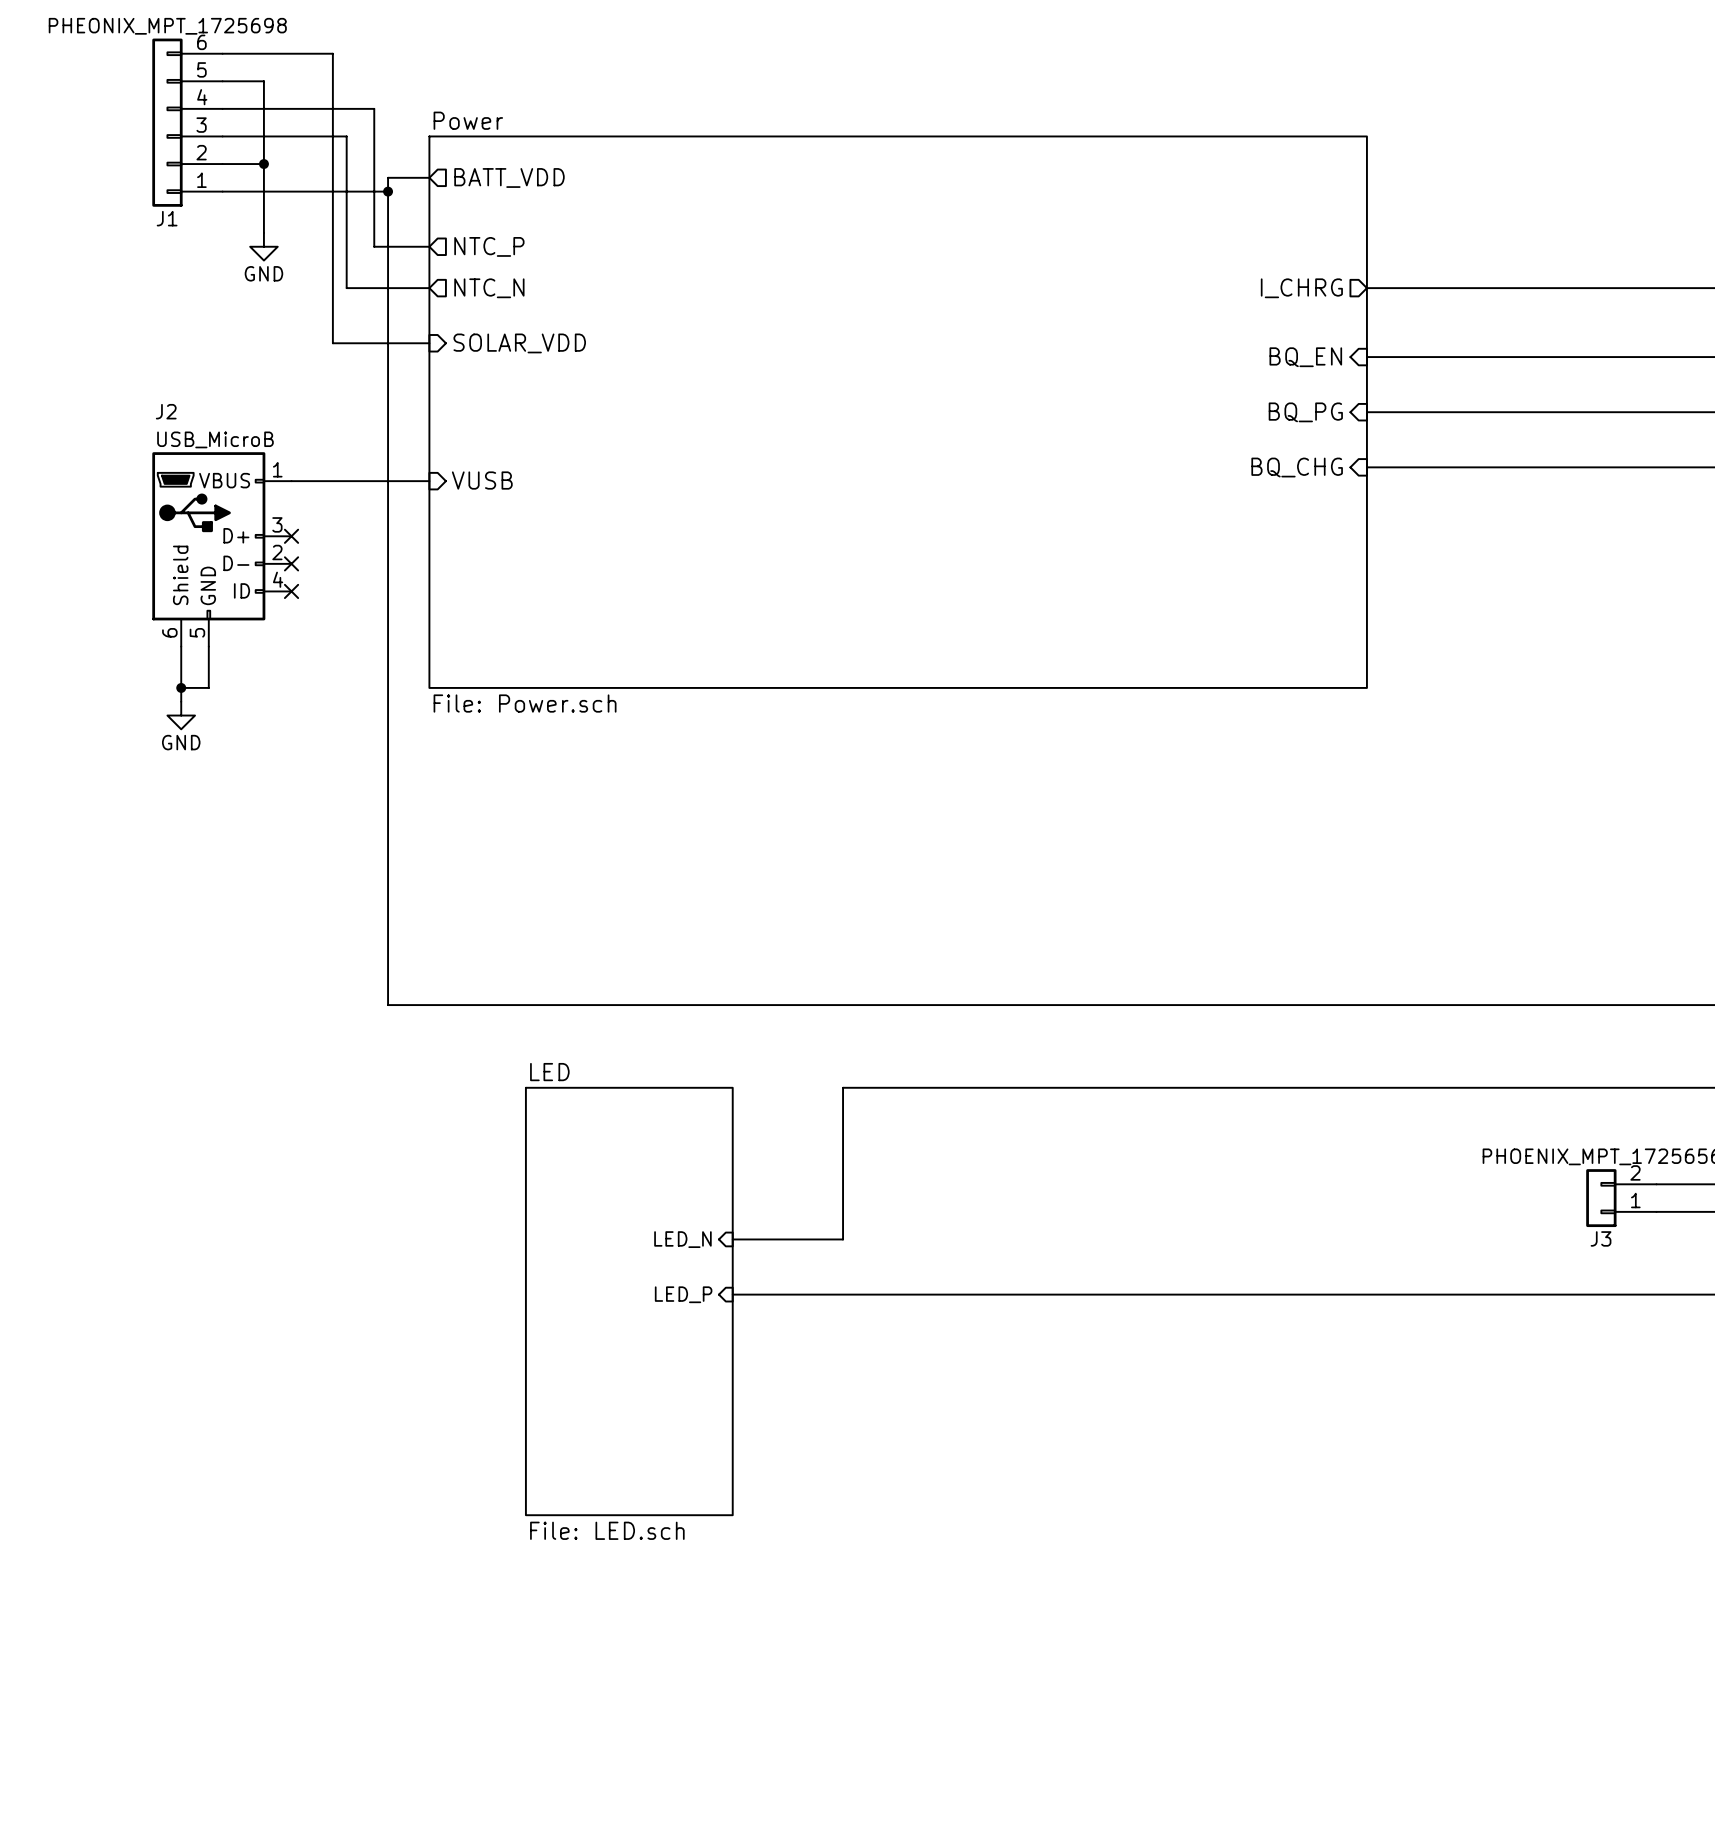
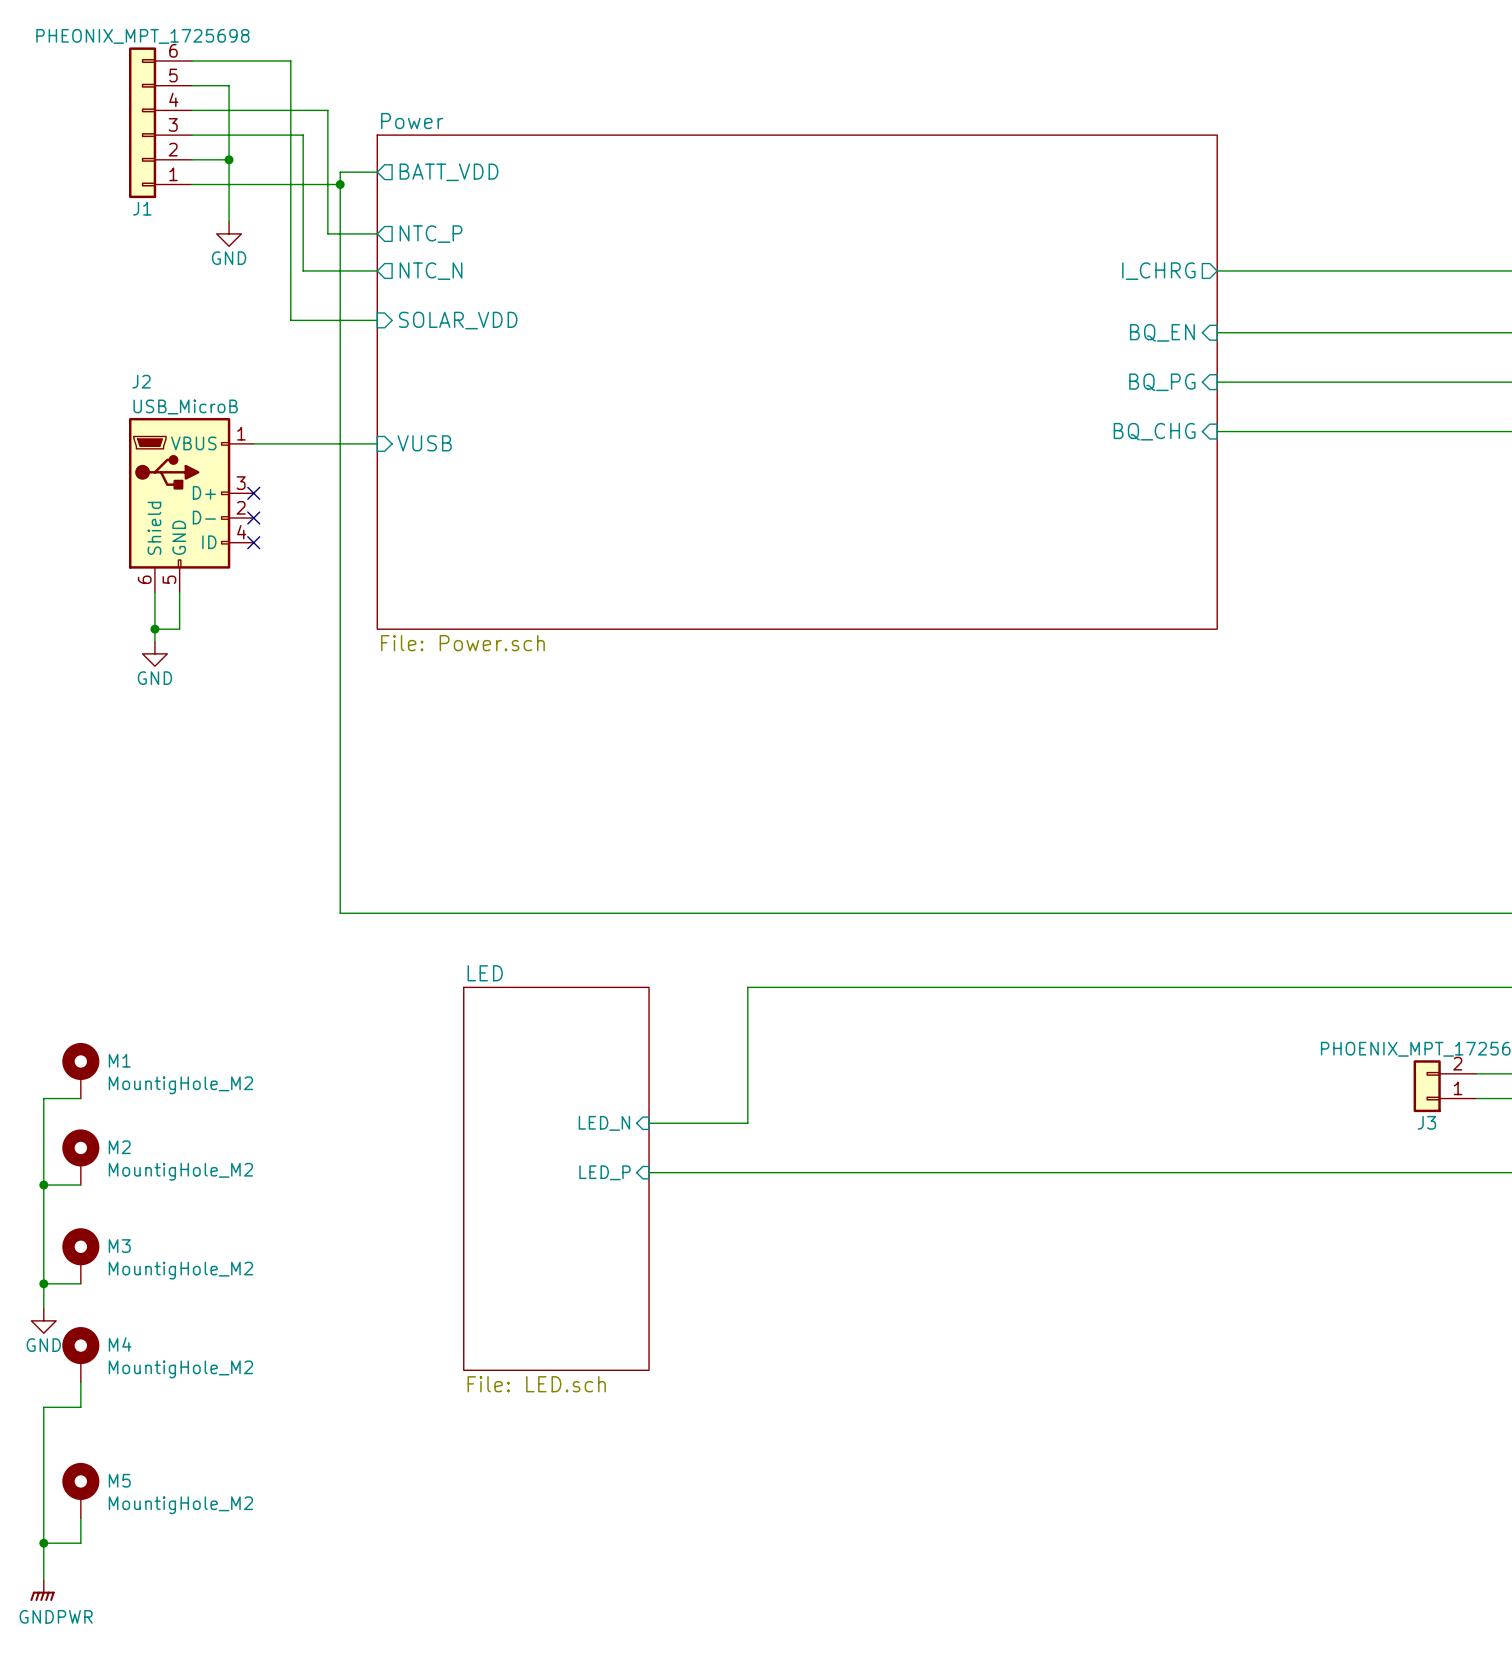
M1: none -> MountigHole_M2 (80, 1070)
wire: none -> (80, 1098) (43, 1098) (43, 1308)
M2: none -> MountigHole_M2 (80, 1157)
wire: none -> (43, 1185) (80, 1185)
junction: none -> (43, 1185)
M3: none -> MountigHole_M2 (80, 1256)
wire: none -> (43, 1283) (80, 1283)
junction: none -> (43, 1283)
power symbol: none -> GND (43, 1320)
M4: none -> MountigHole_M2 (80, 1354)
wire: none -> (80, 1382) (80, 1407) (43, 1407) (43, 1580)
M5: none -> MountigHole_M2 (80, 1490)
wire: none -> (80, 1518) (80, 1543) (43, 1543)
junction: none -> (43, 1543)
power symbol: none -> GNDPWR (42, 1590)

